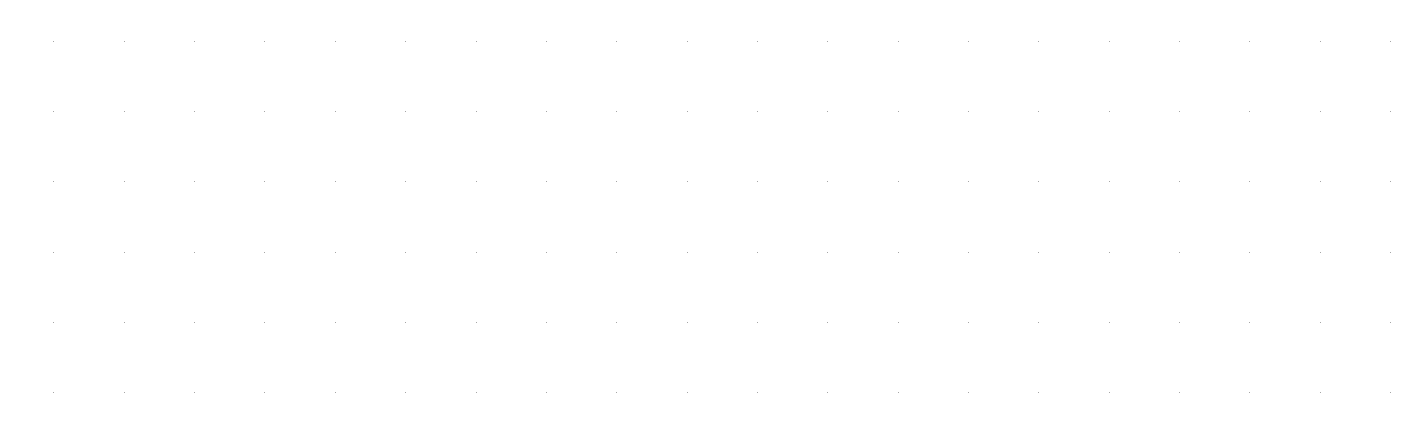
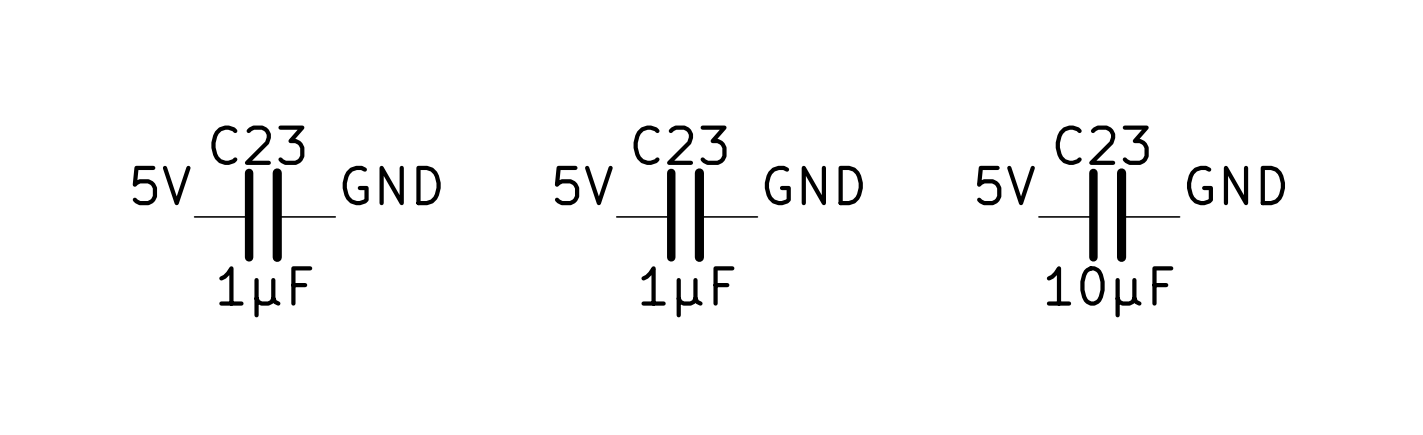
label: none -> 5V (161, 185)
label: none -> GND (391, 185)
label: none -> 5V (583, 185)
label: none -> GND (813, 185)
label: none -> 5V (1005, 185)
label: none -> GND (1236, 185)
C23: none -> 1μF (264, 215)
C23: none -> 1μF (687, 215)
C23: none -> 10μF (1109, 215)

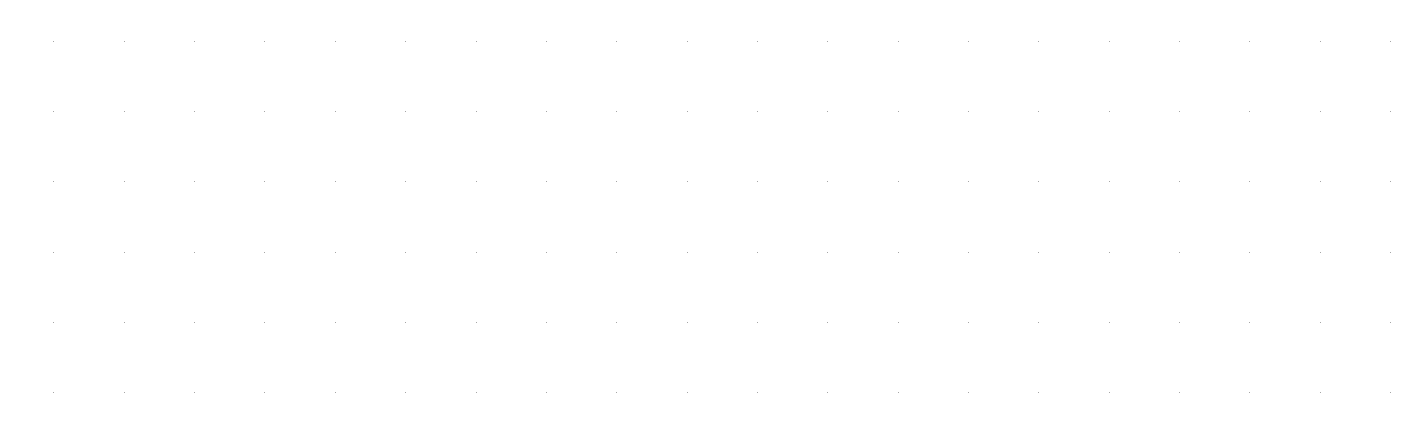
label: 5V (161, 185) -> none
label: GND (391, 185) -> none
label: 5V (583, 185) -> none
label: GND (813, 185) -> none
label: 5V (1005, 185) -> none
label: GND (1236, 185) -> none
C23: 1μF (264, 215) -> none
C23: 1μF (687, 215) -> none
C23: 10μF (1109, 215) -> none

